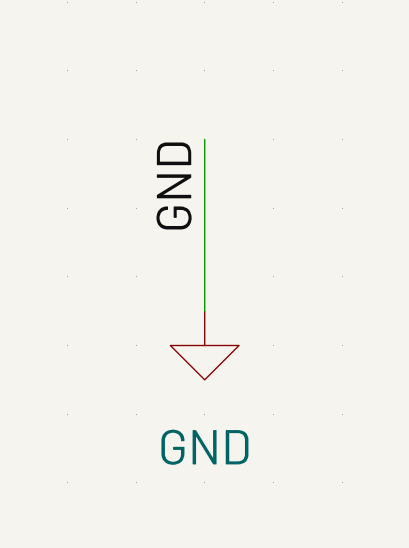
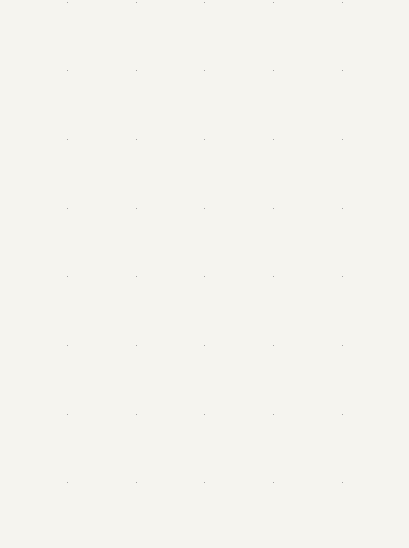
wire: (204, 139) (204, 311) -> none
label: GND (174, 185) -> none
power symbol: GND (204, 345) -> none

